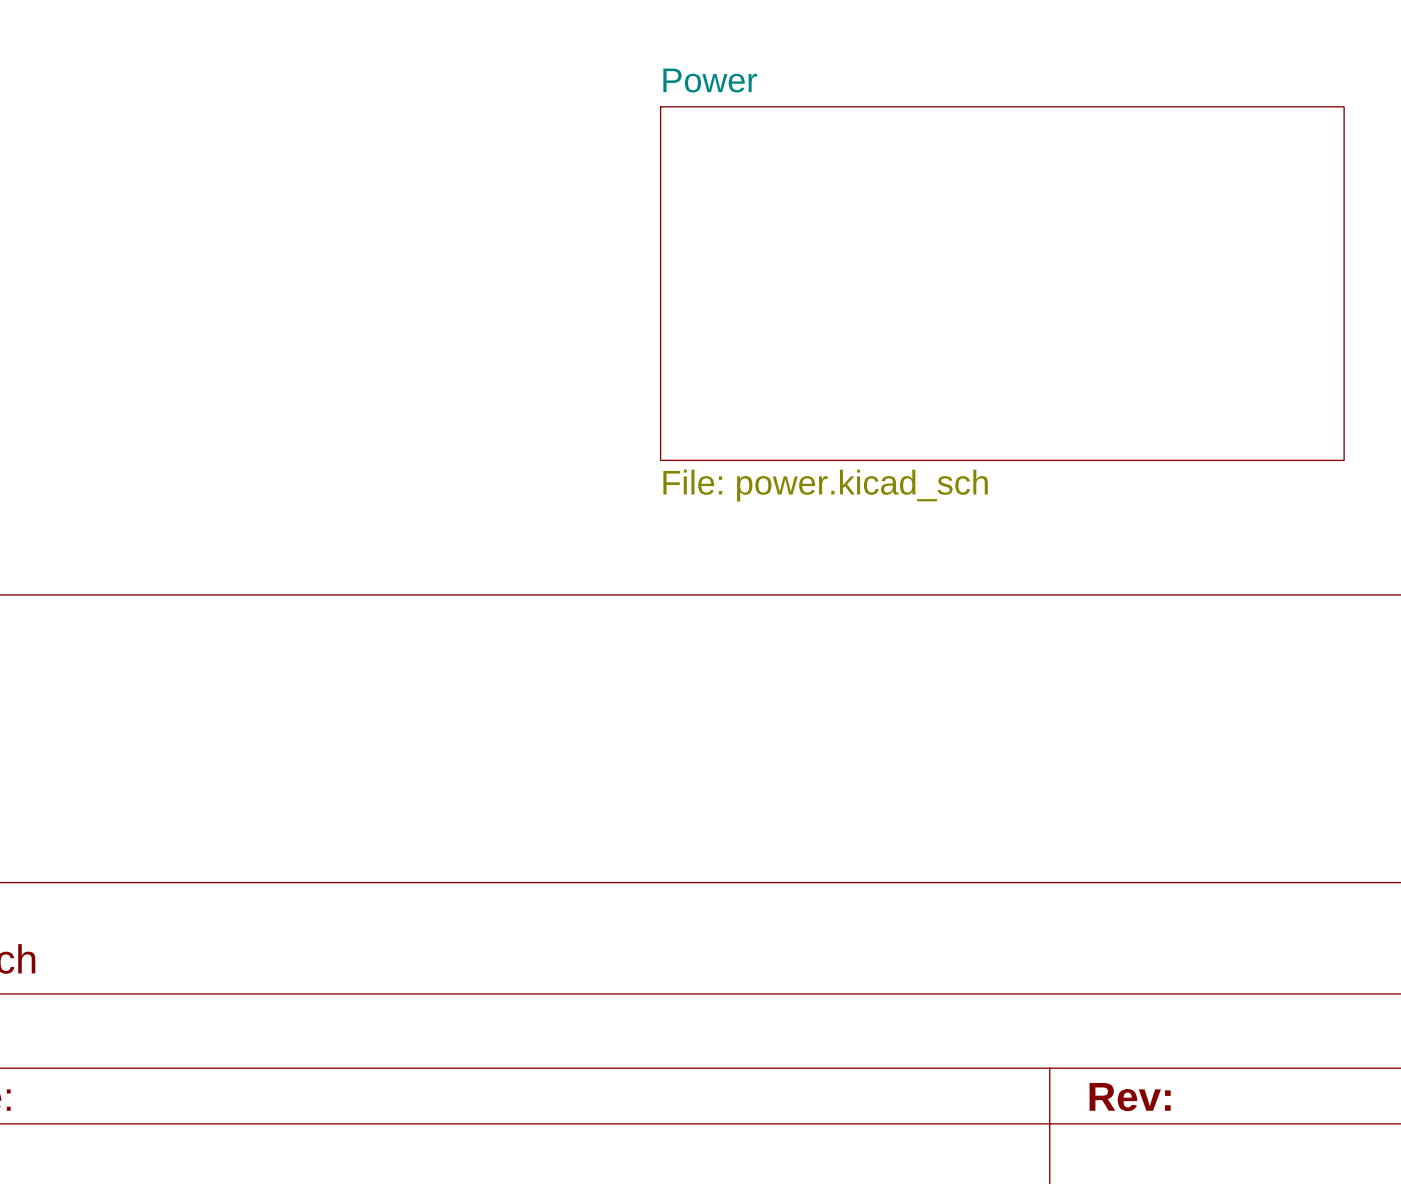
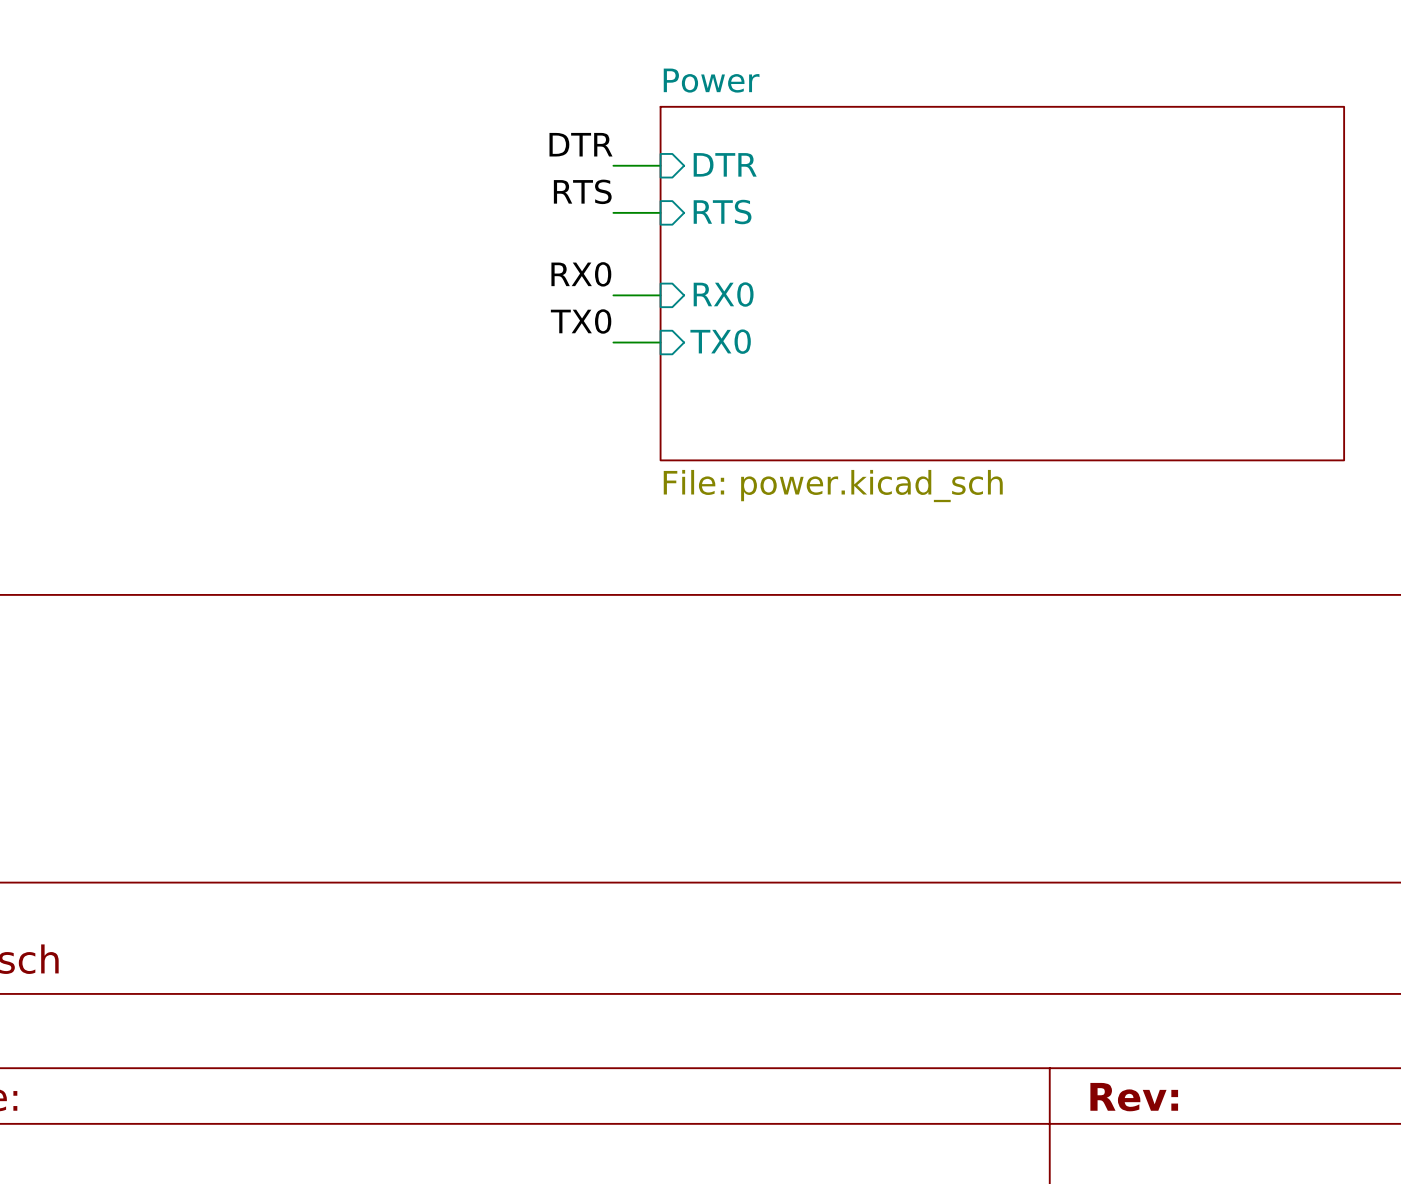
label: none -> DTR (581, 144)
sheet pin: none -> DTR (725, 164)
wire: none -> (613, 165) (660, 165)
label: none -> RTS (582, 191)
wire: none -> (613, 212) (660, 212)
sheet pin: none -> RTS (722, 212)
label: none -> RX0 (581, 274)
sheet pin: none -> RX0 (723, 294)
wire: none -> (613, 295) (660, 295)
label: none -> TX0 (581, 321)
sheet pin: none -> TX0 (720, 341)
wire: none -> (613, 342) (660, 342)

